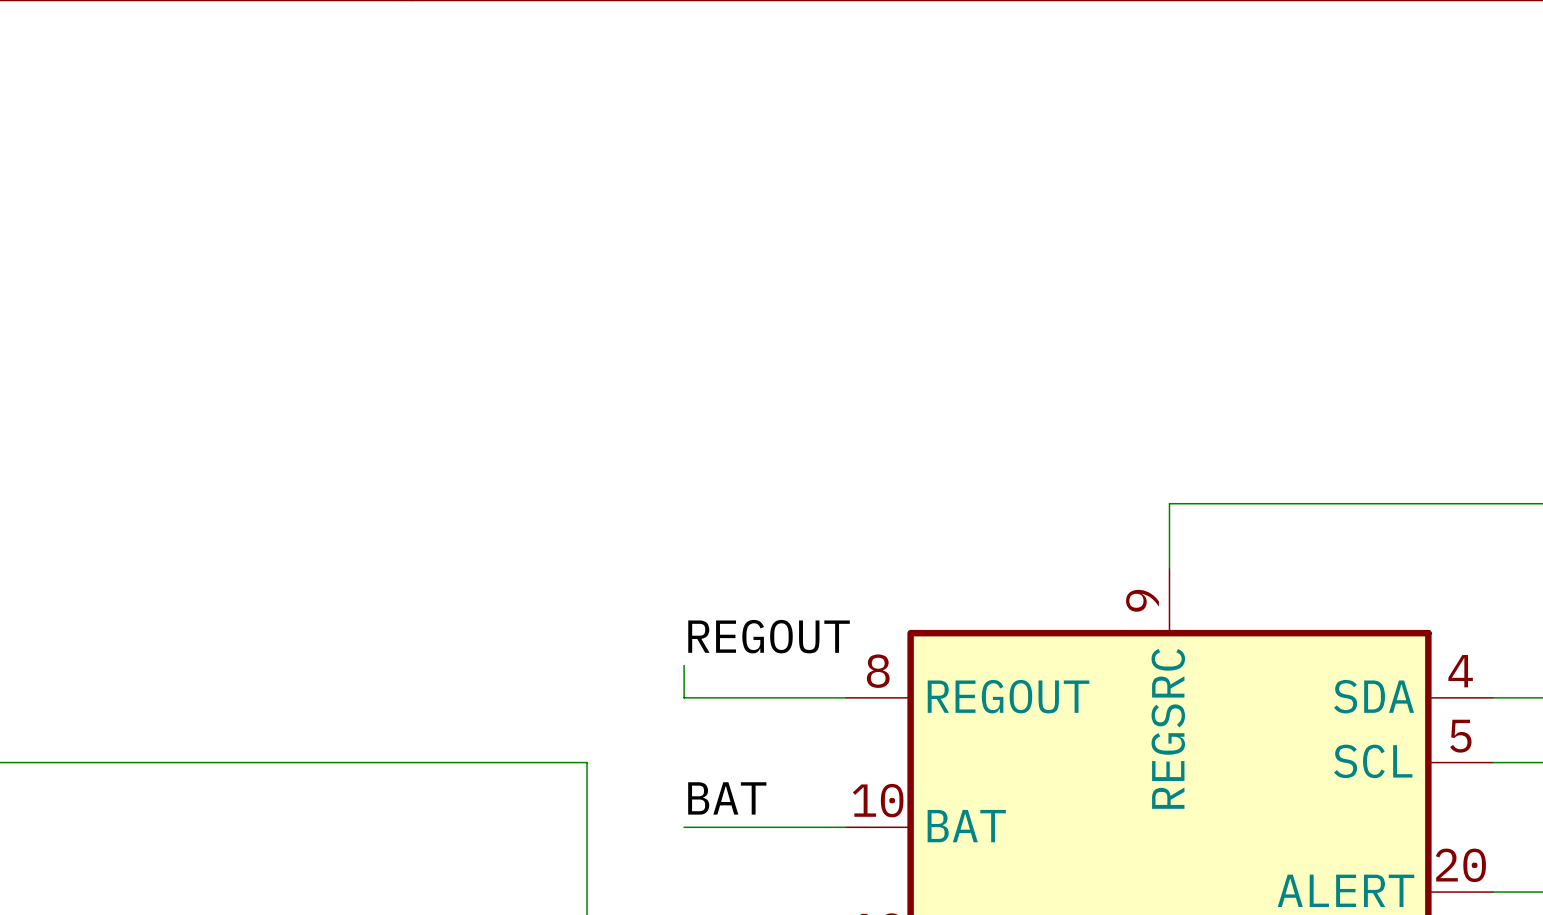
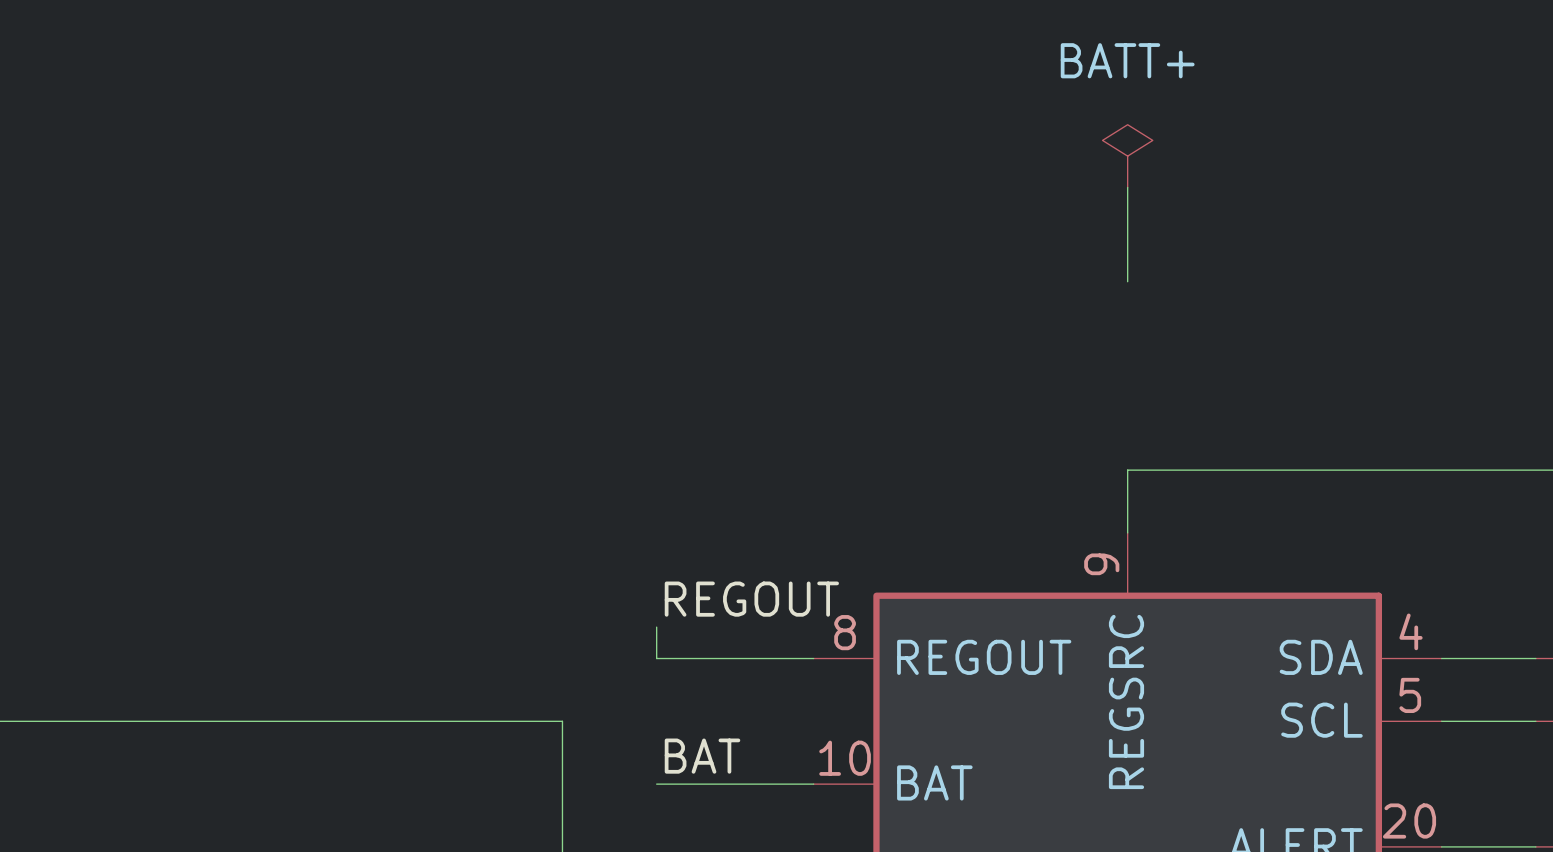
power symbol: none -> BATT+ (1127, 156)
wire: none -> (1127, 187) (1127, 281)

